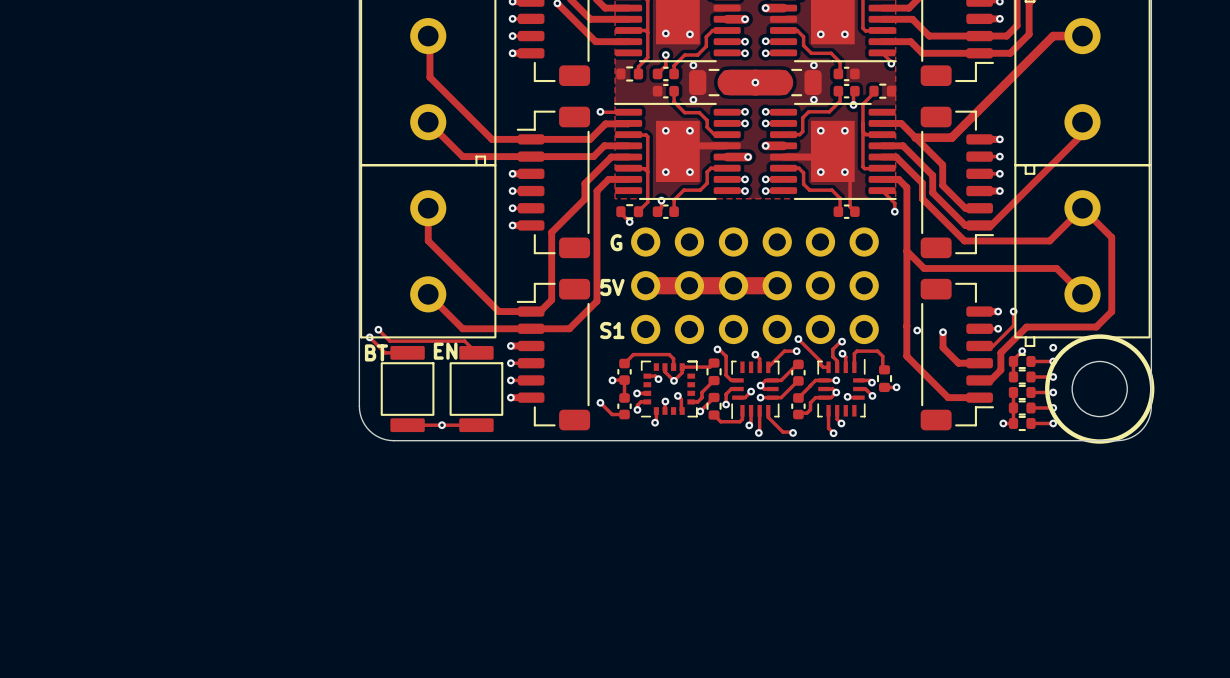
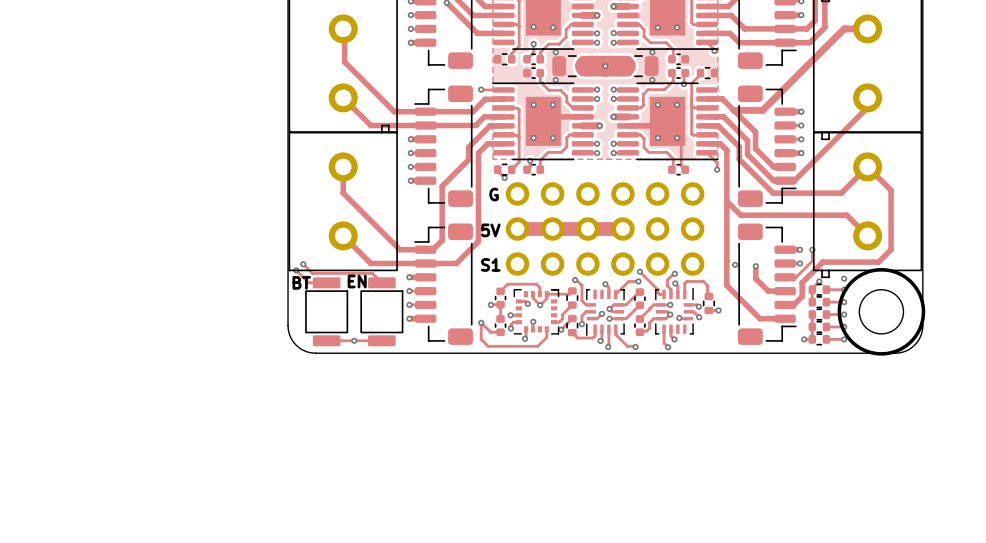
track: (677, 395) (681, 399) (682, 410) -> (481, 322) (481, 339) (488, 346) (537, 346) (546, 337) (546, 329)
via: (677, 395) -> none

